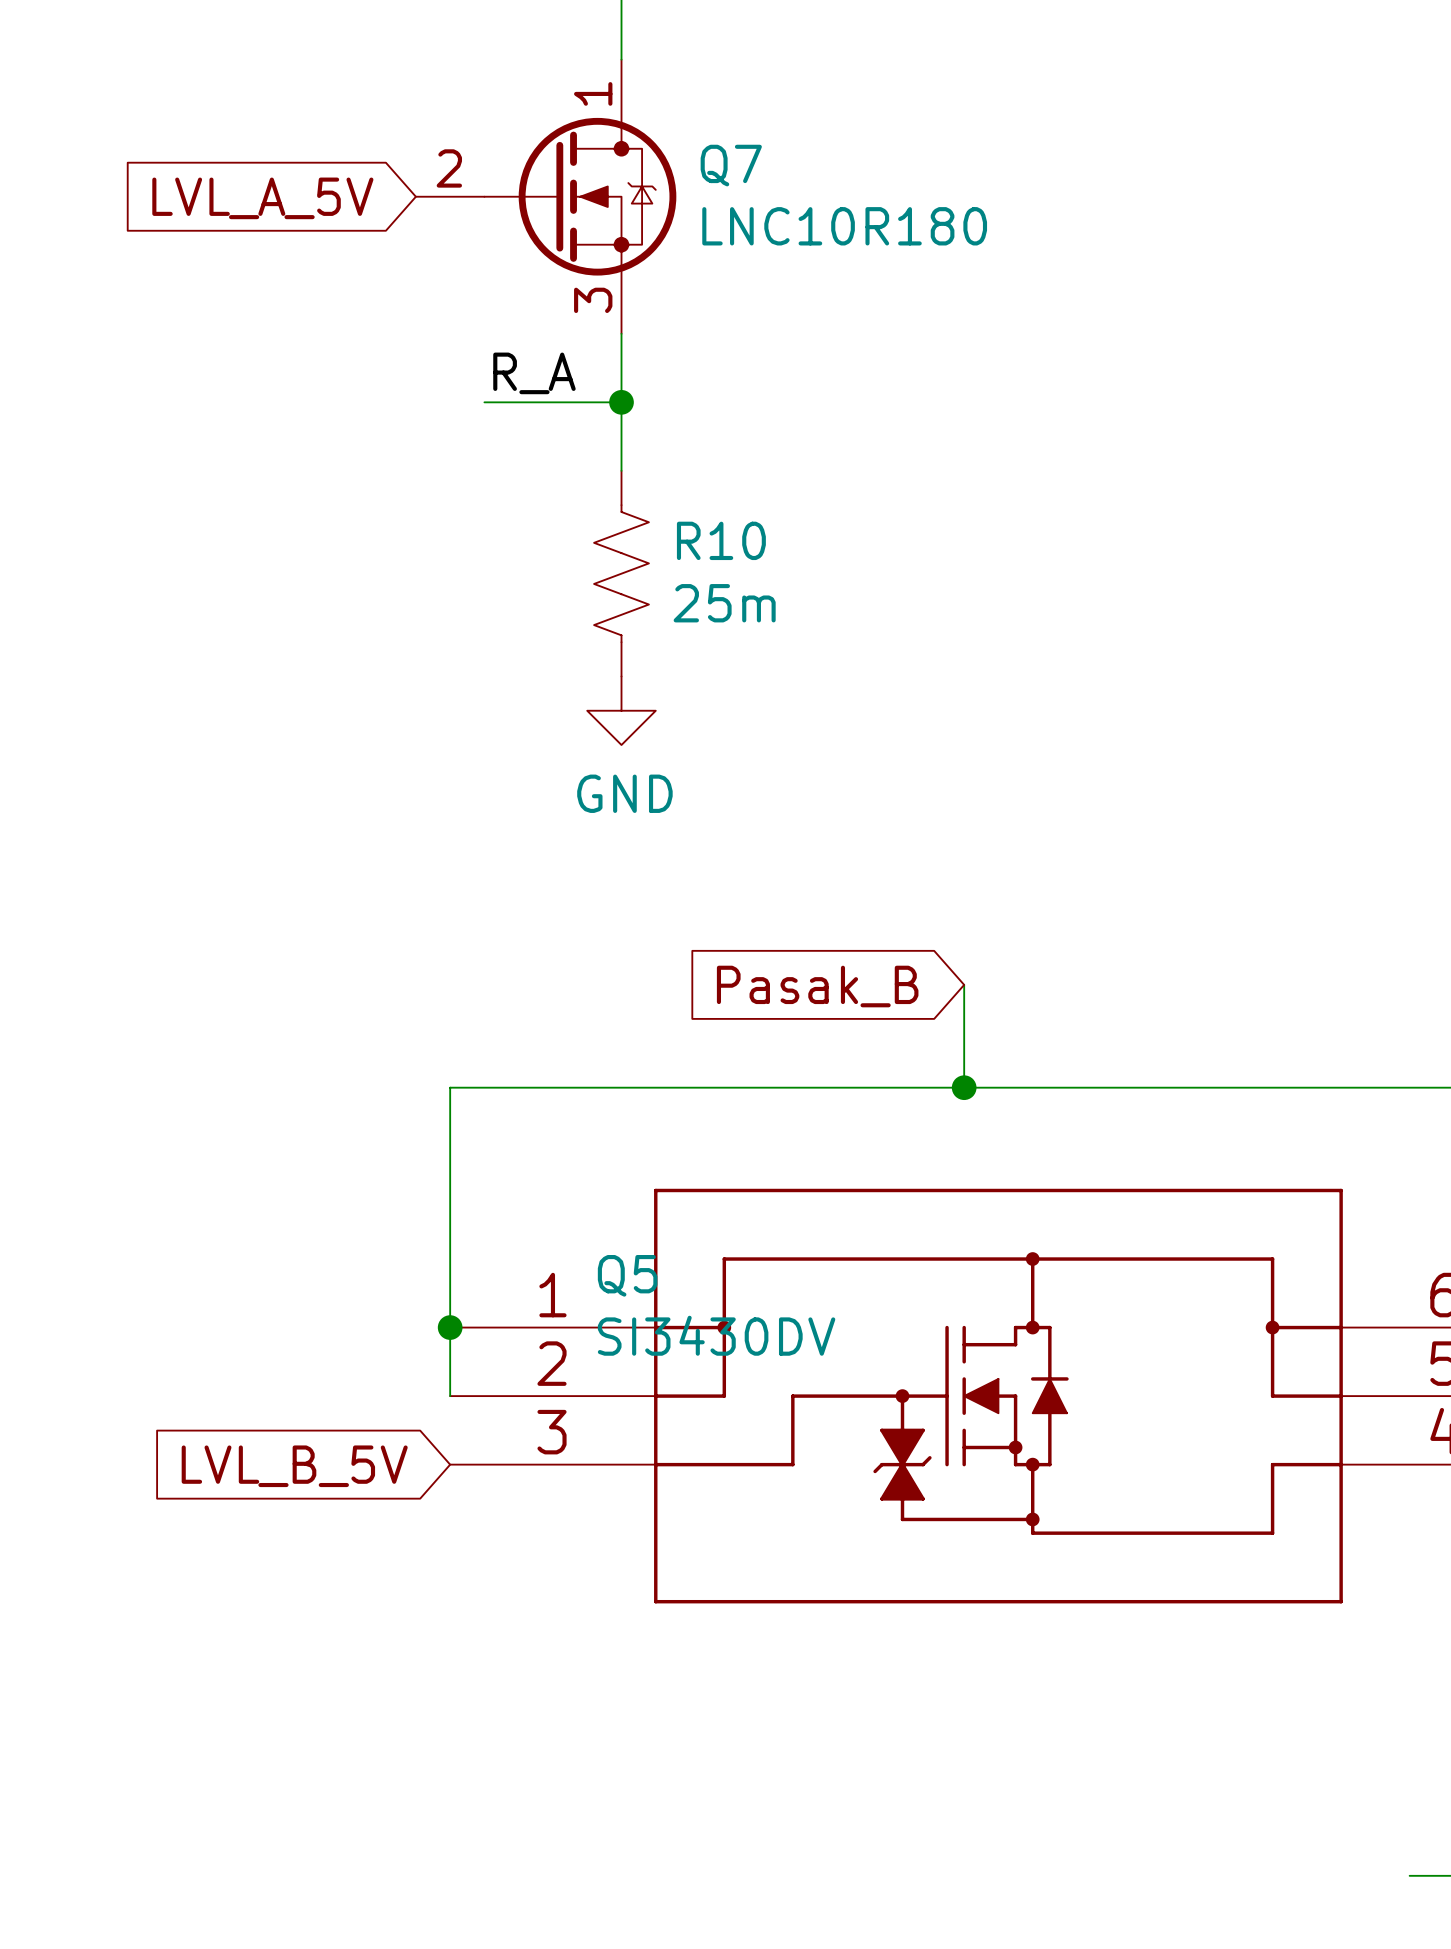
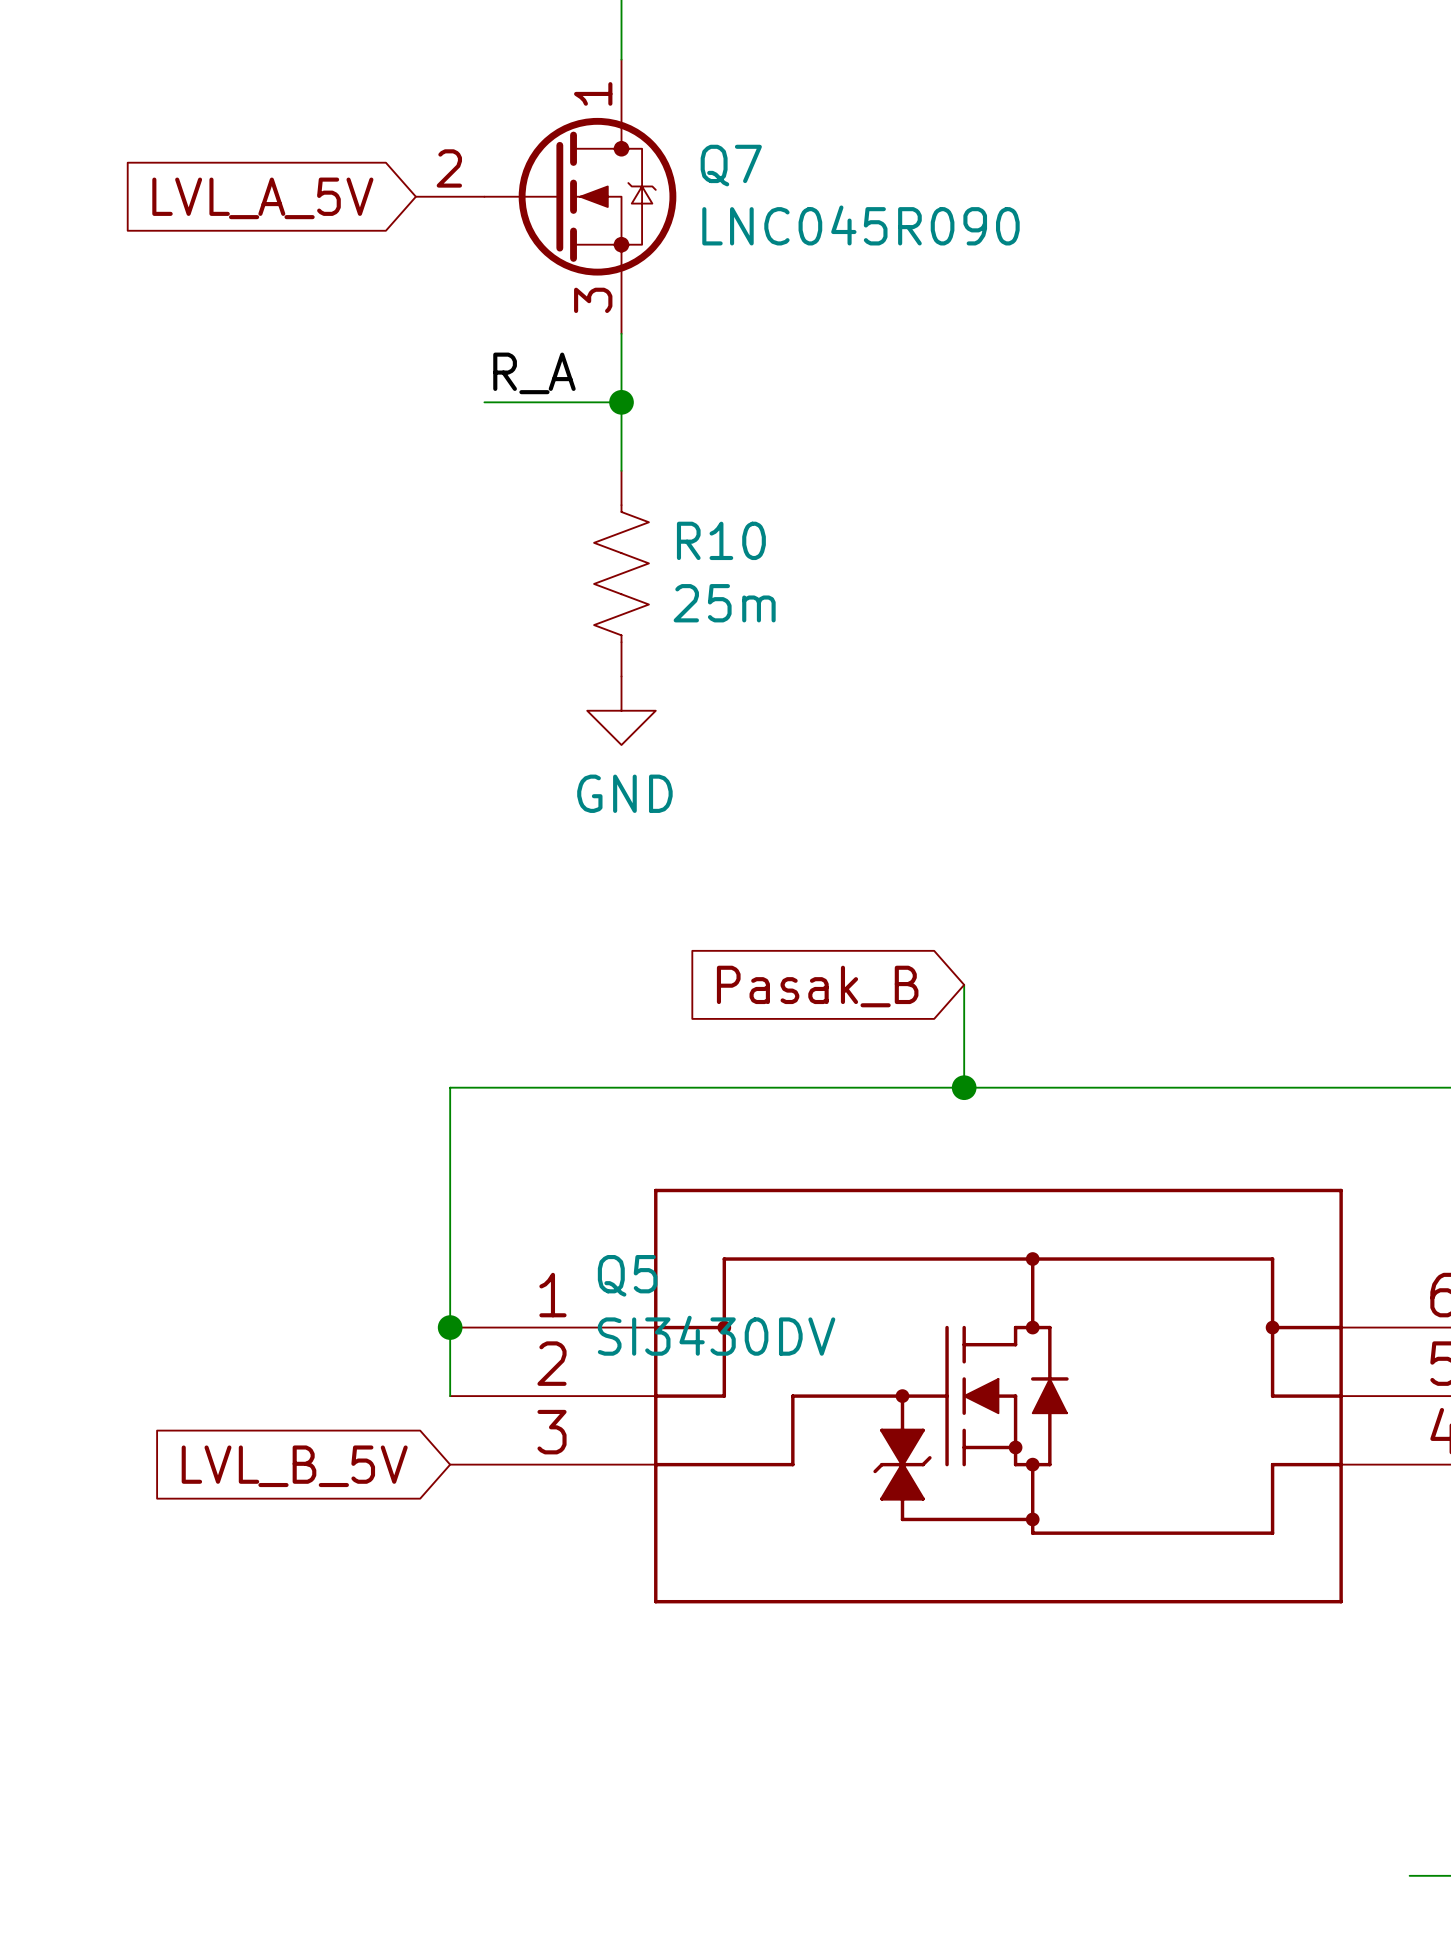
Q7 value: LNC10R180 (844, 226) -> LNC045R090 (860, 225)

